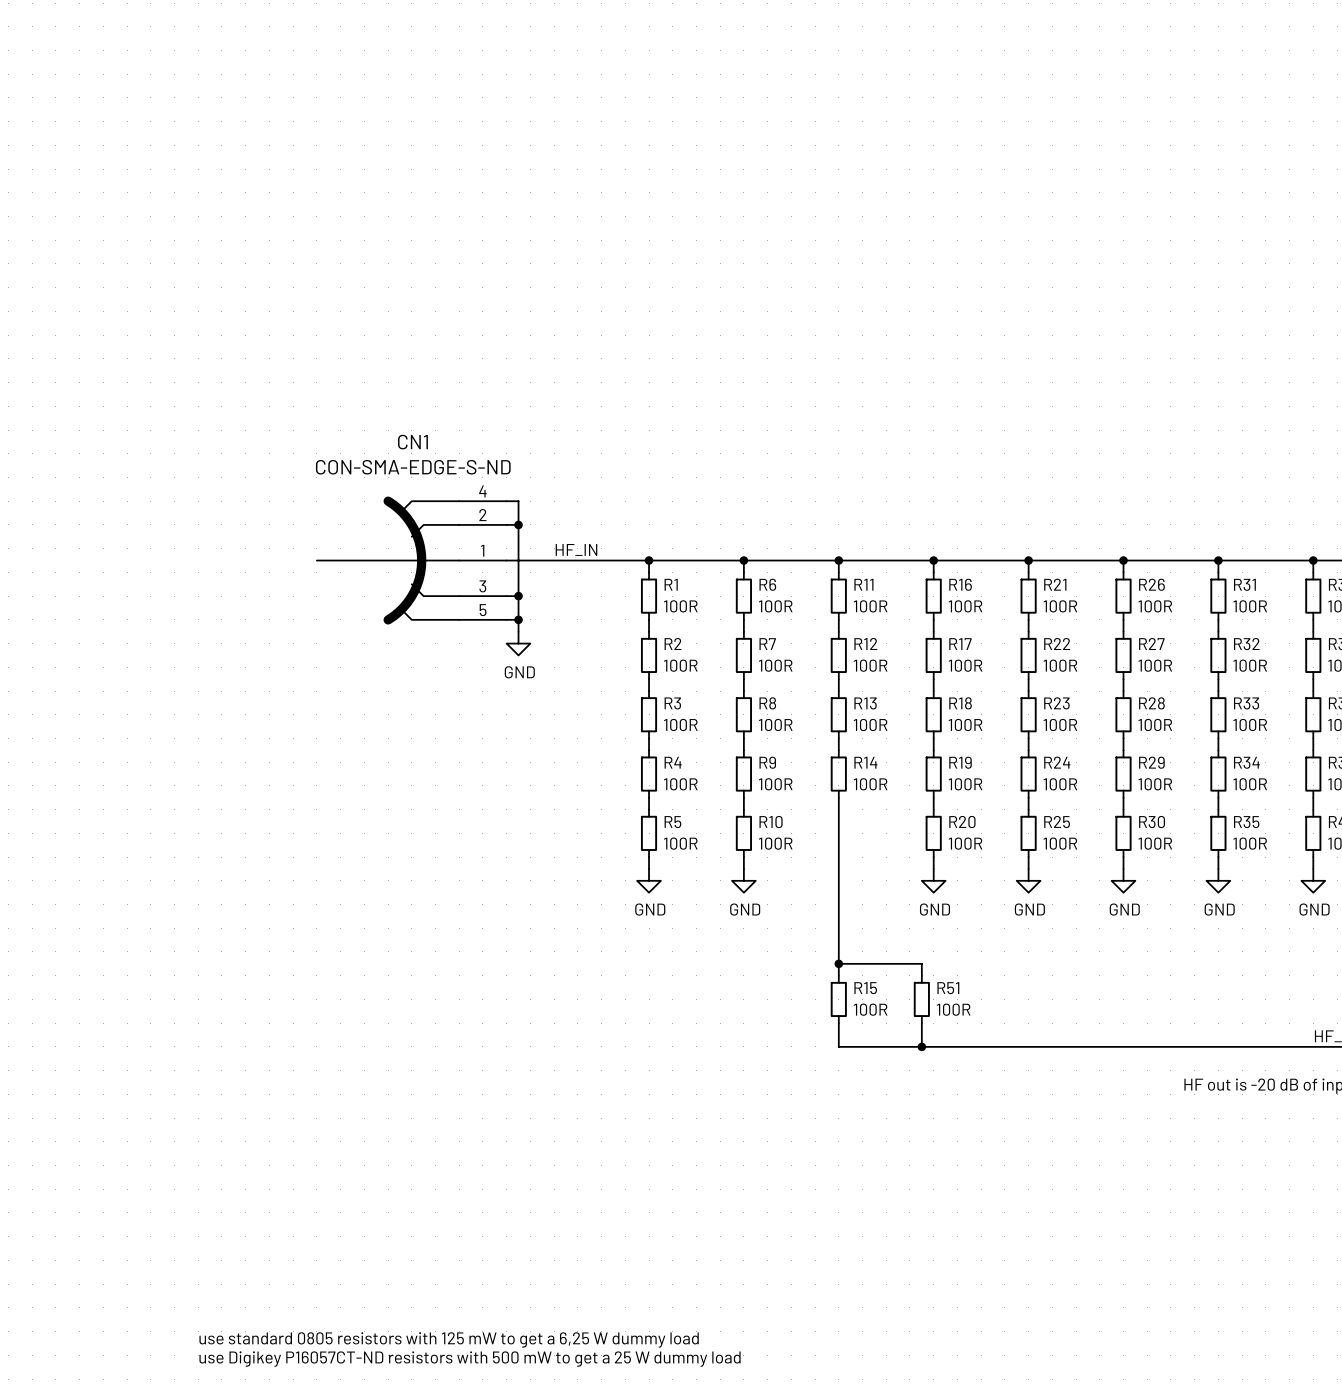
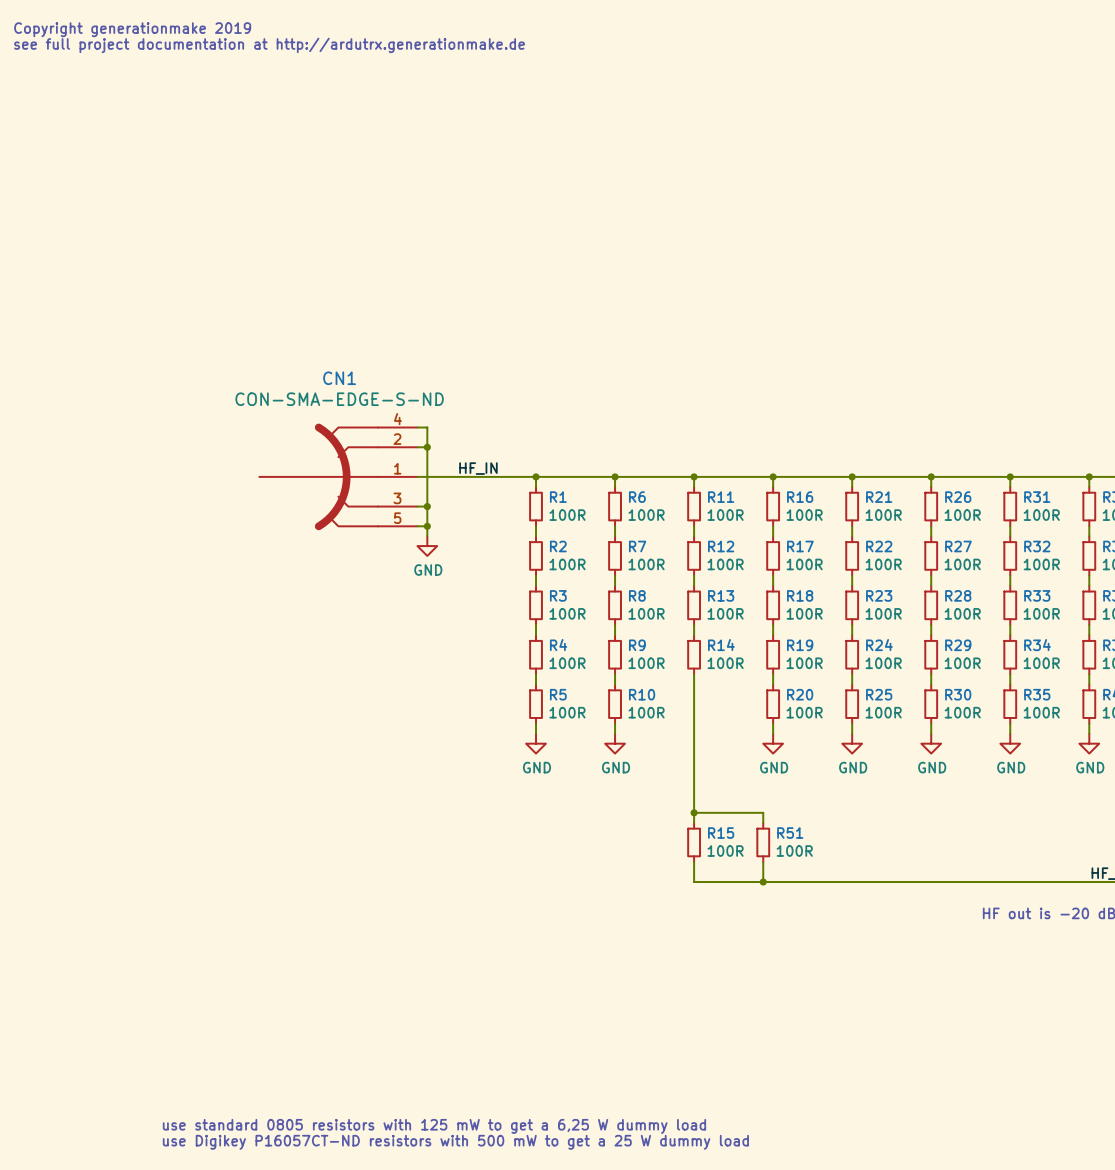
text: none -> Copyright generationmake 2019 (132, 29)
text: none -> see full project documentation at http://ardutrx.generationmake.de (269, 45)

